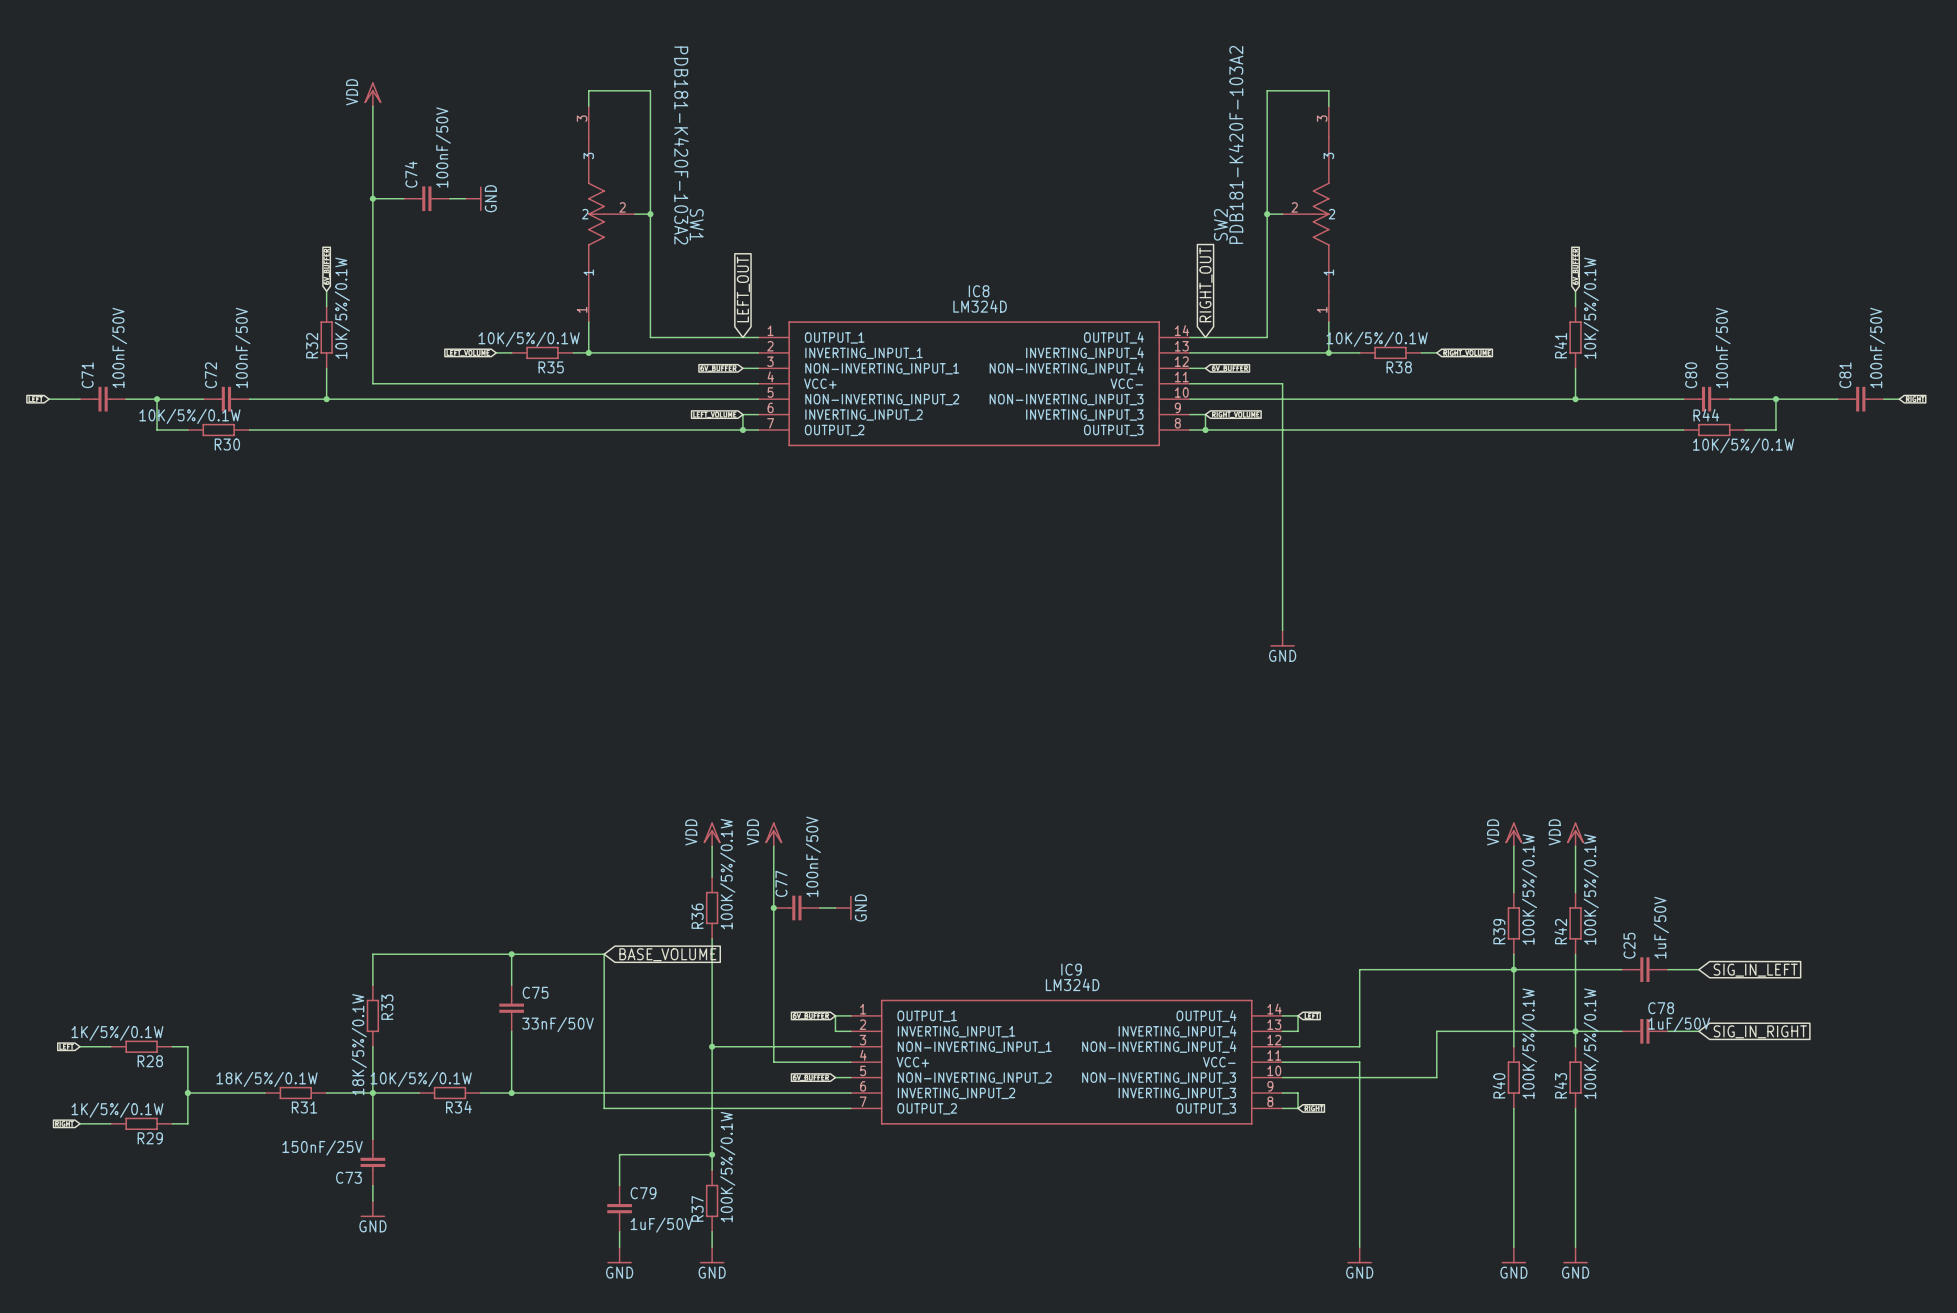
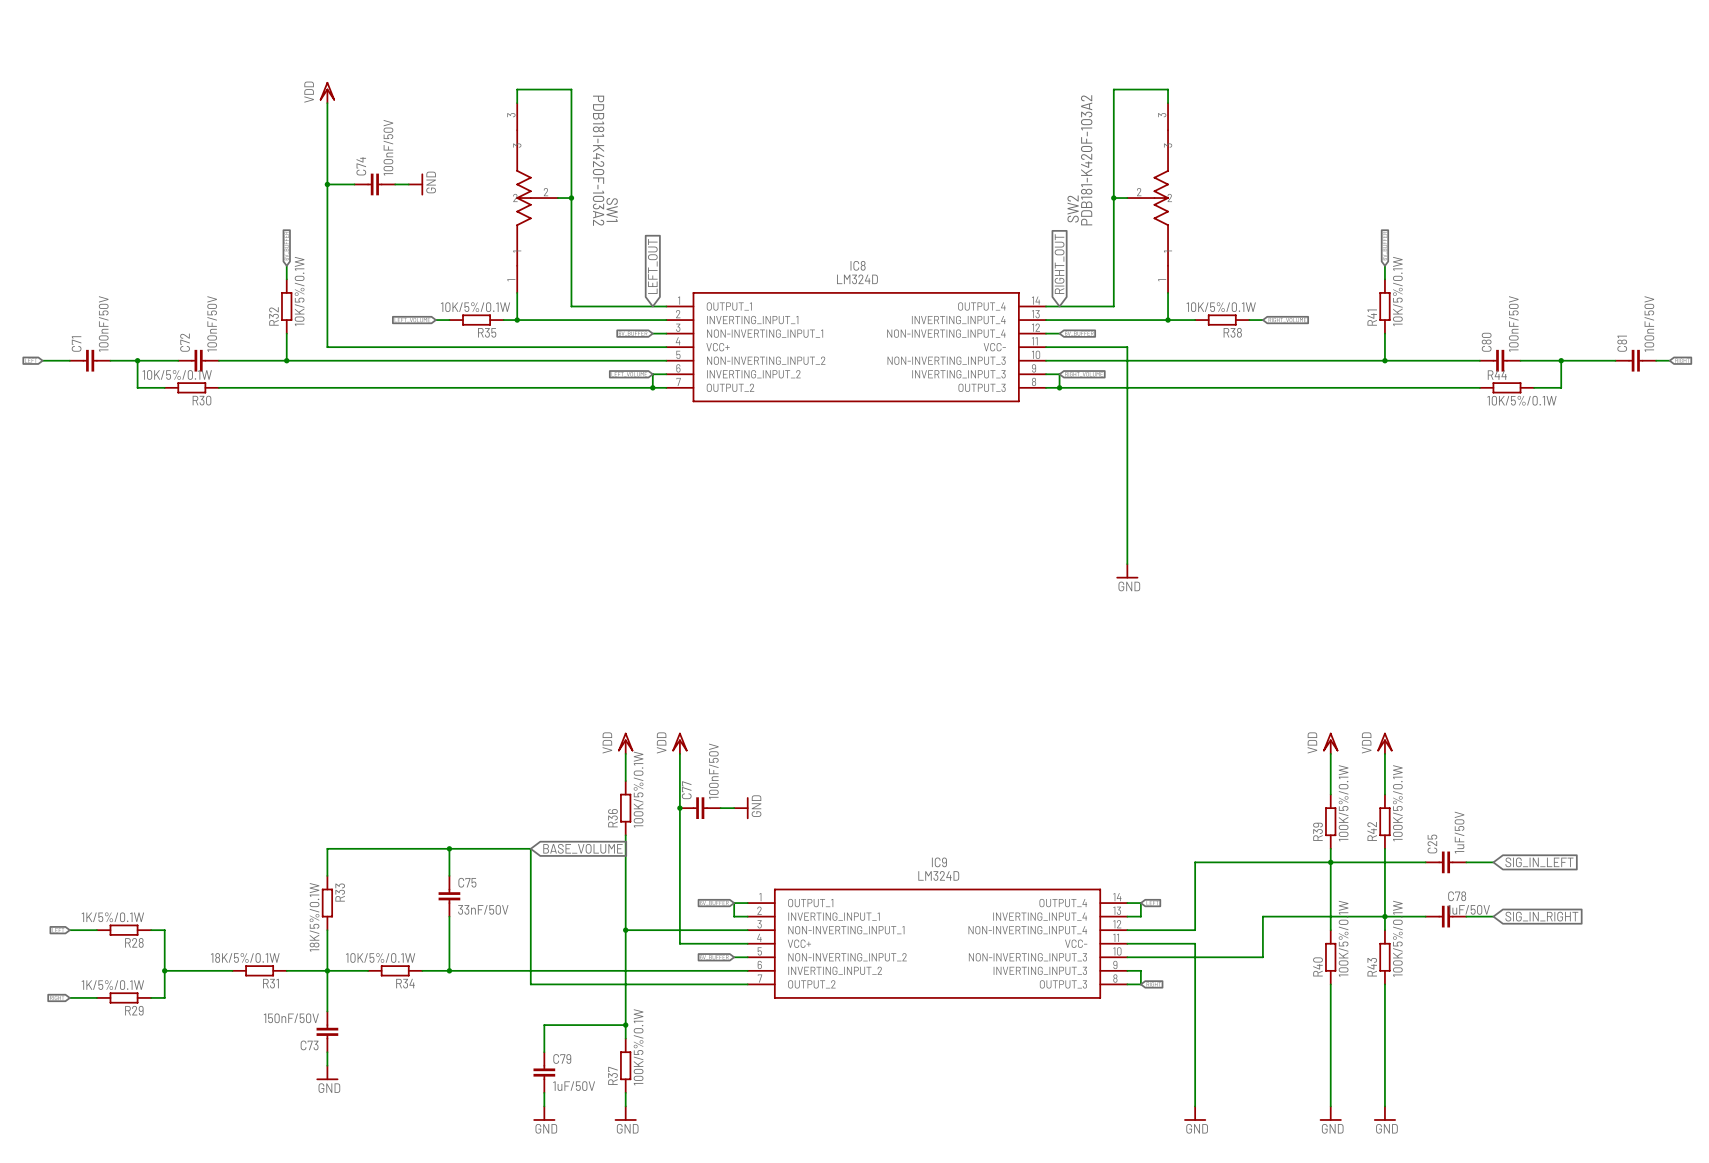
C73 value: 150nF/25V (322, 1148) -> 150nF/50V (291, 1018)

